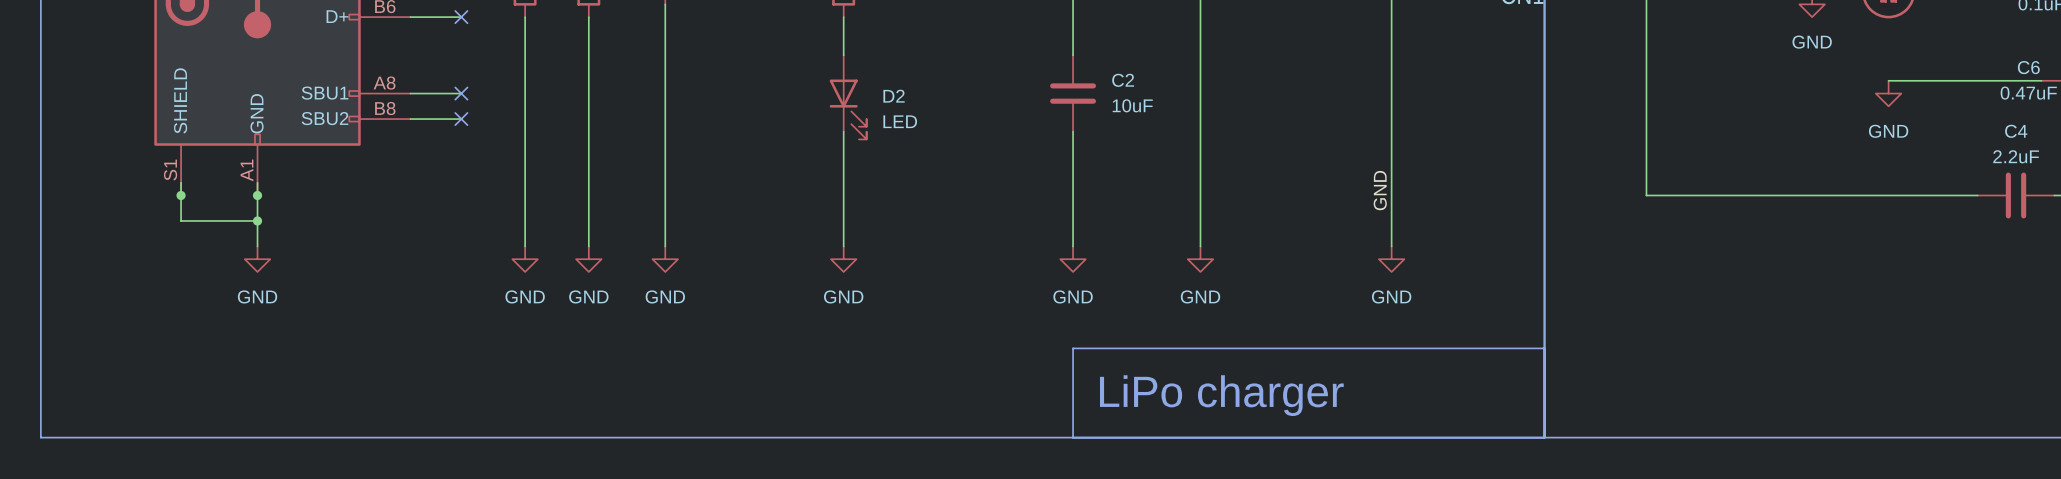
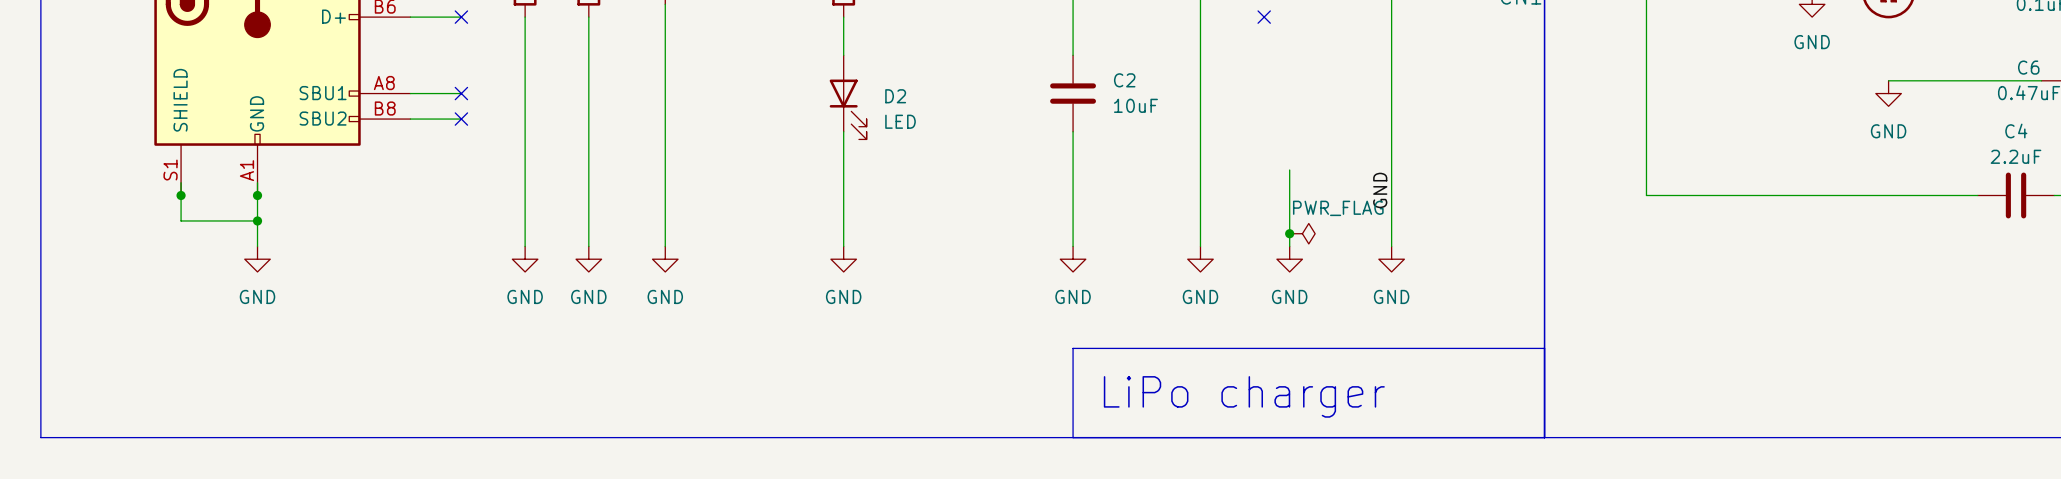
no-connect mark: none -> (1264, 17)
wire: none -> (1289, 170) (1289, 246)
junction: none -> (1289, 233)
power symbol: none -> PWR_FLAG (1302, 233)
power symbol: none -> GND (1289, 259)

